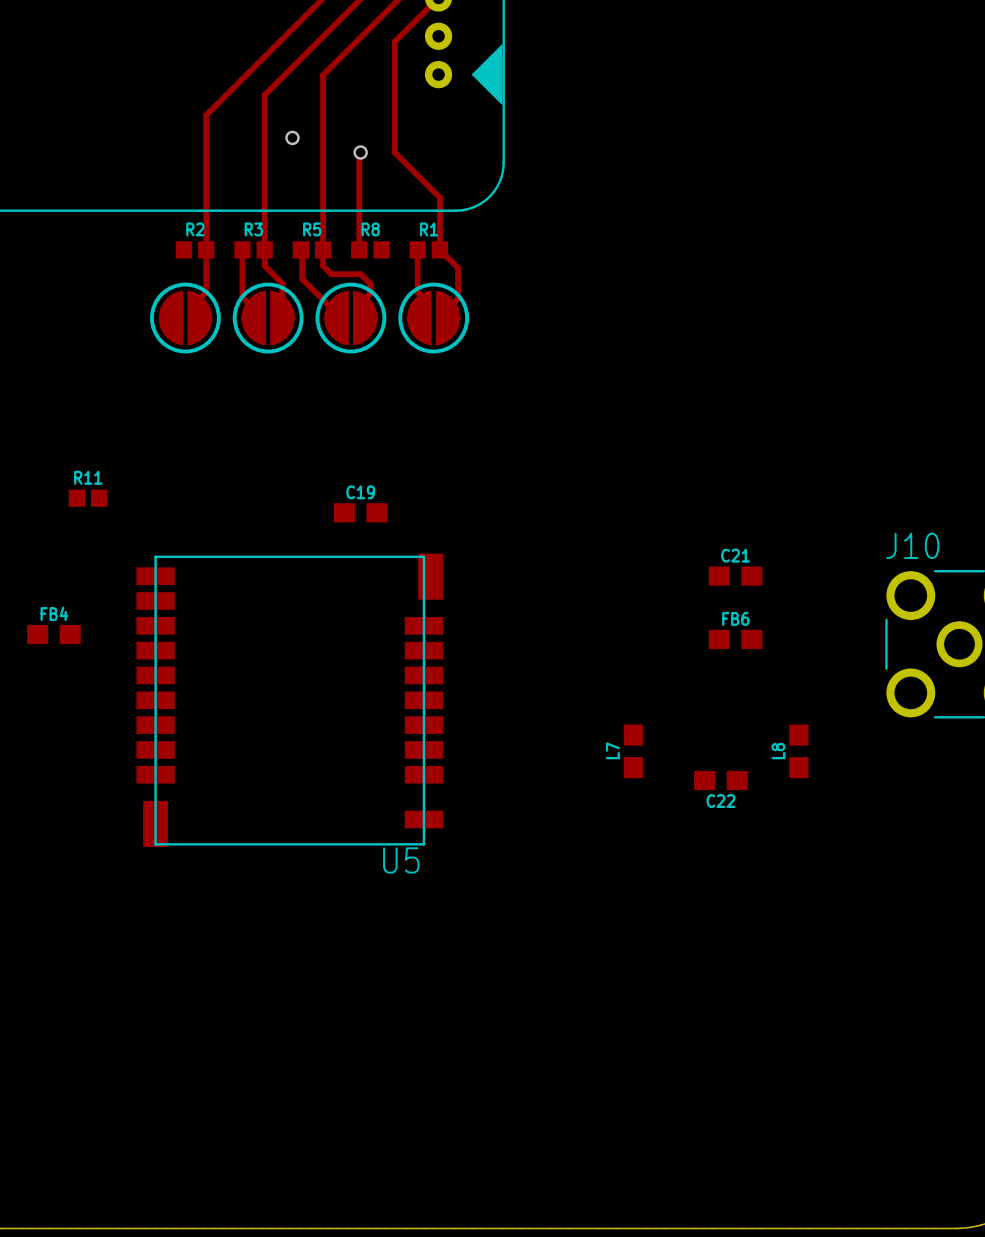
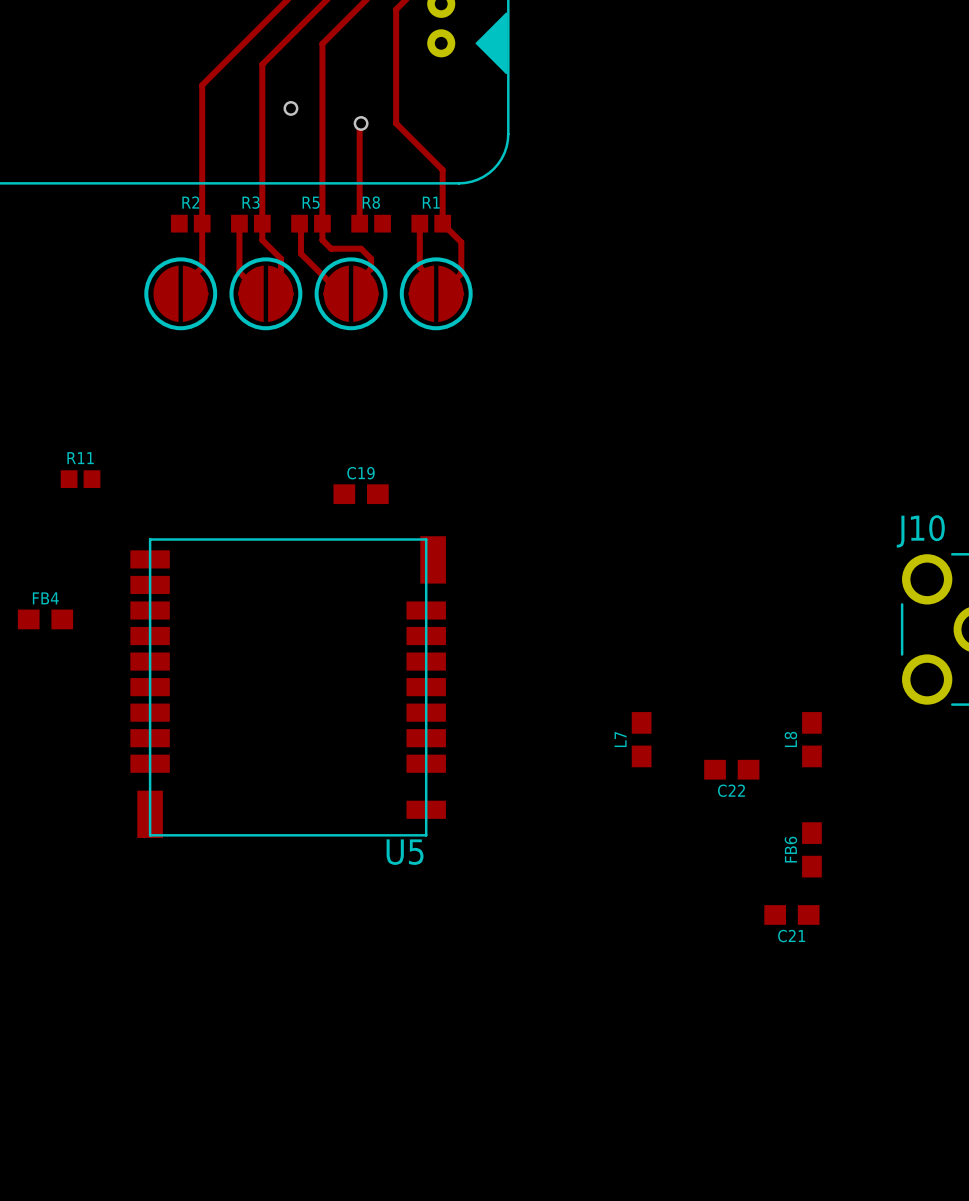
C21 name position: C21 (735, 555) -> C21 (791, 936)
C21 position: (735, 576) -> (791, 914)
FB6 rotation: 0° (735, 639) -> 90° clockwise (811, 849)
FB6 position: (735, 639) -> (811, 849)

